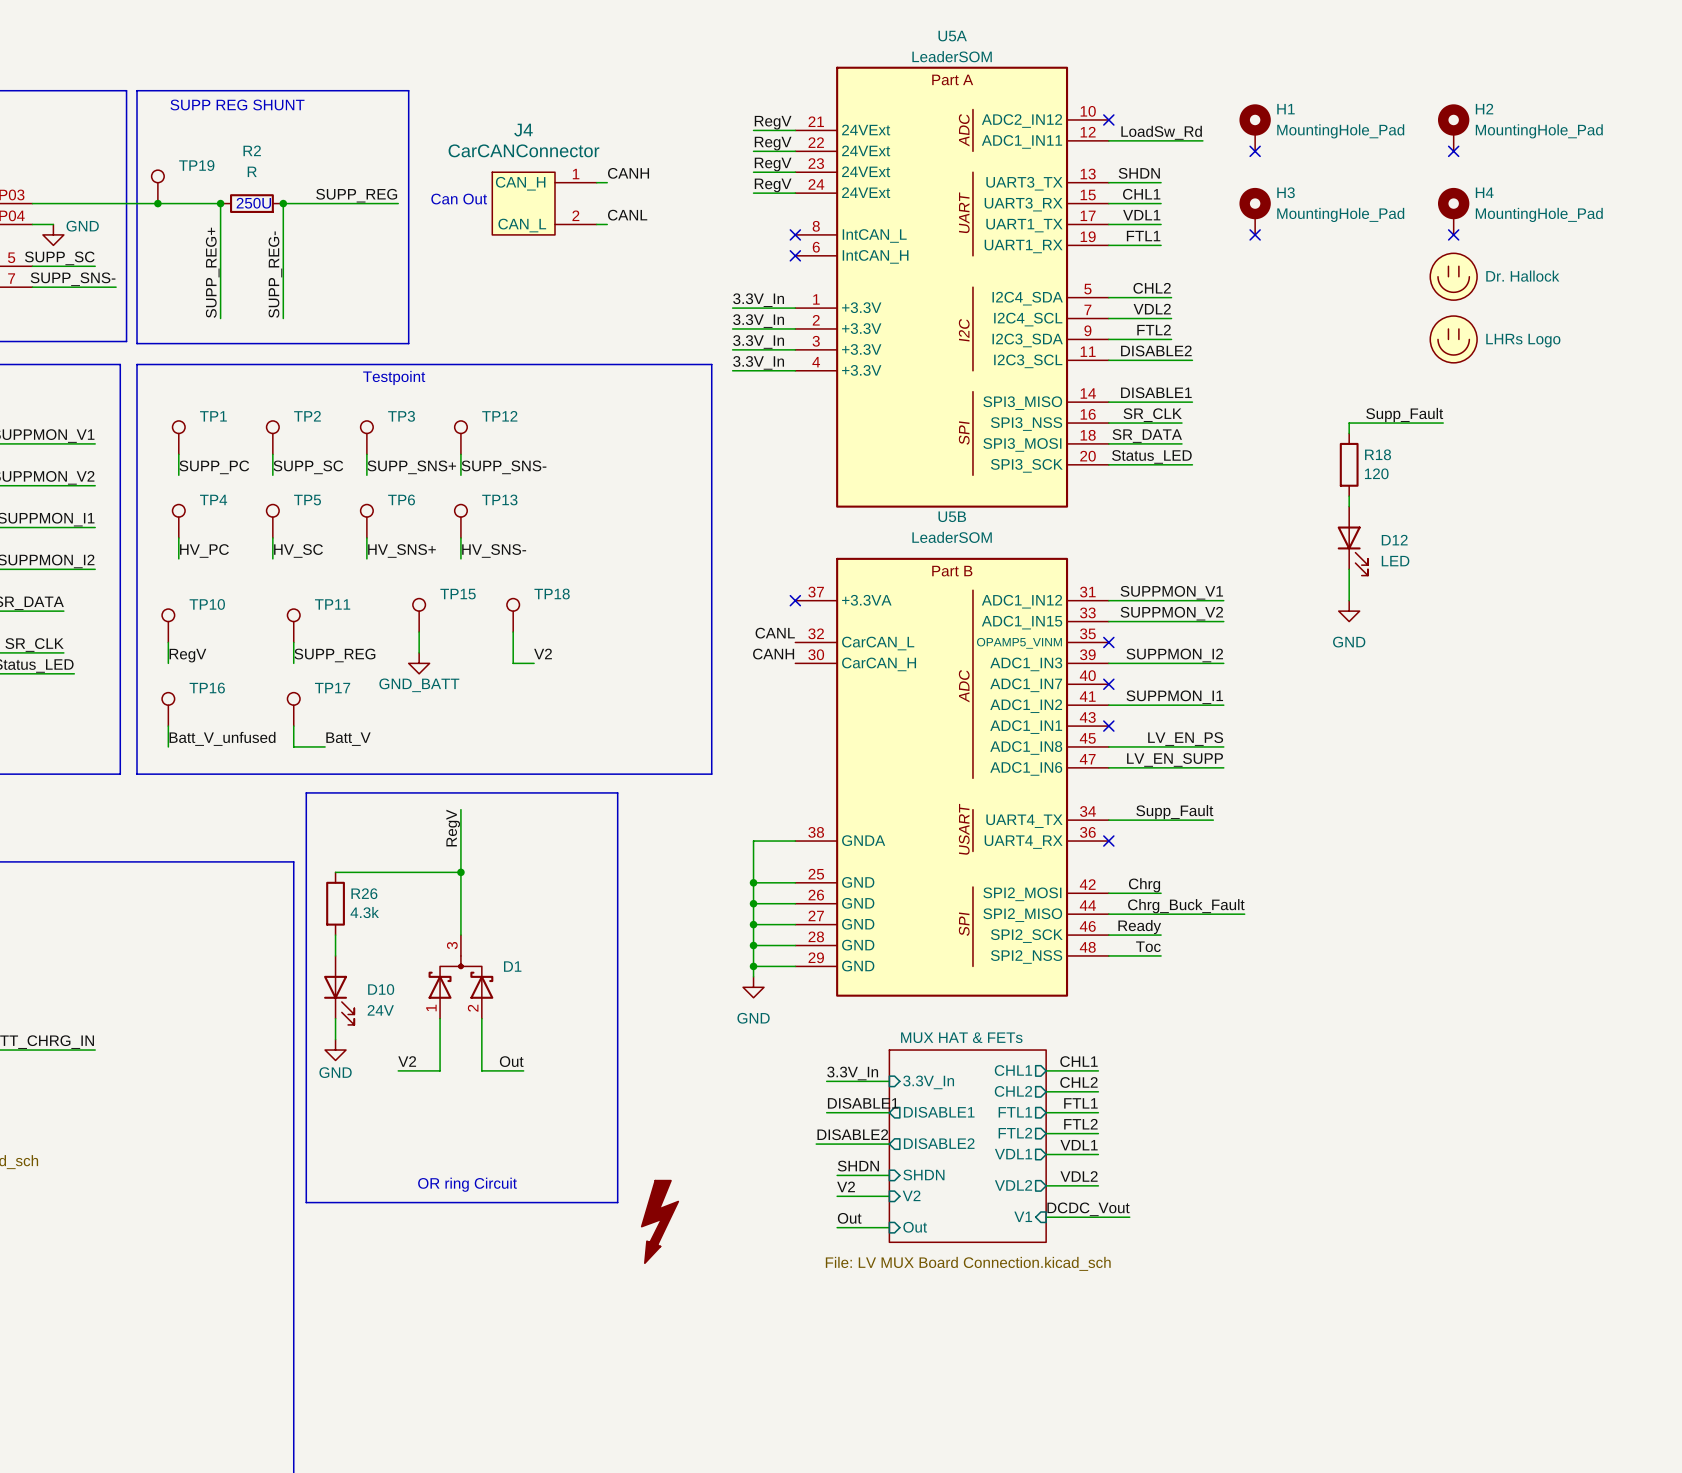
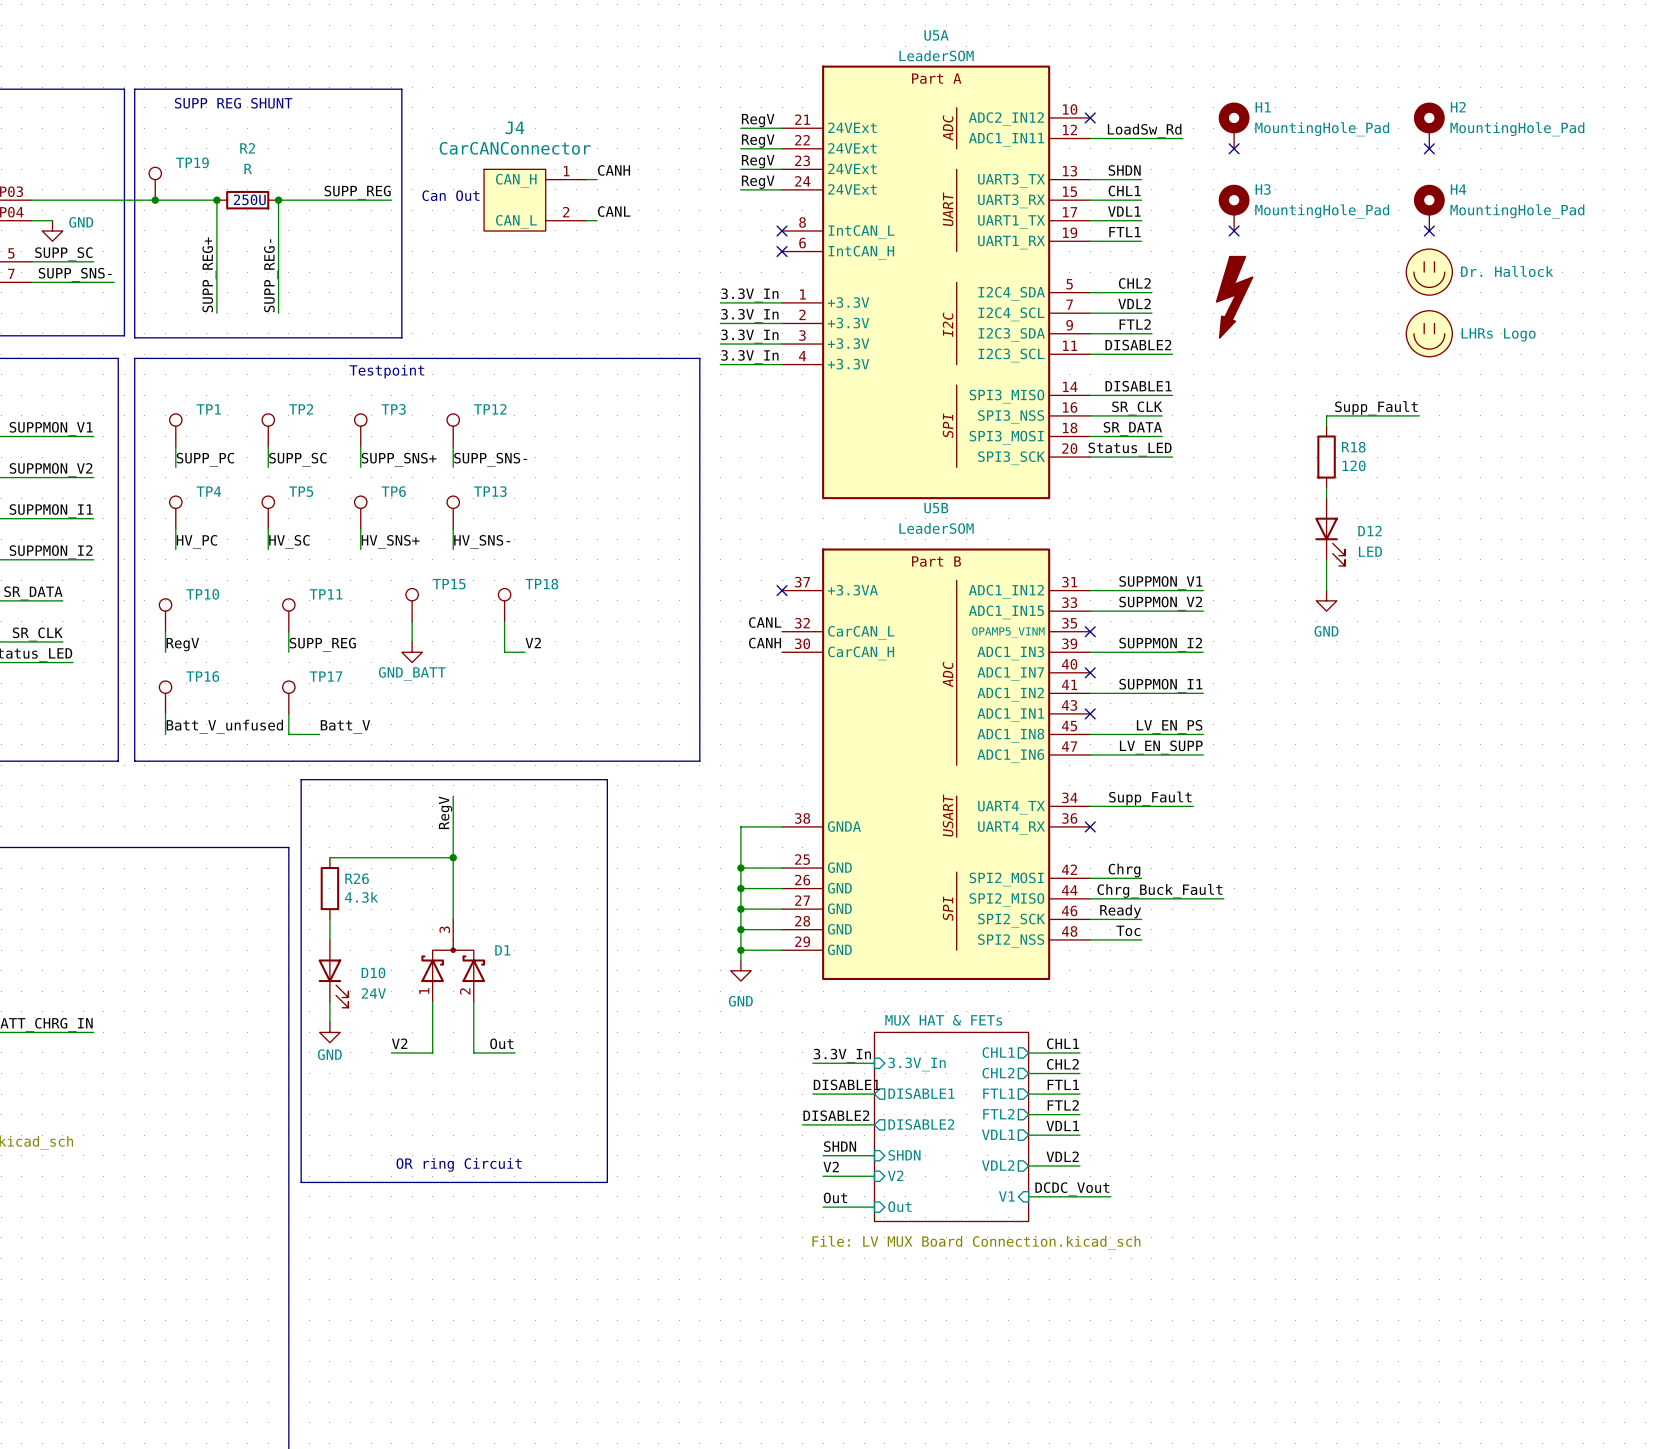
power symbol: none -> (1234, 297)
power symbol: (660, 1221) -> none

